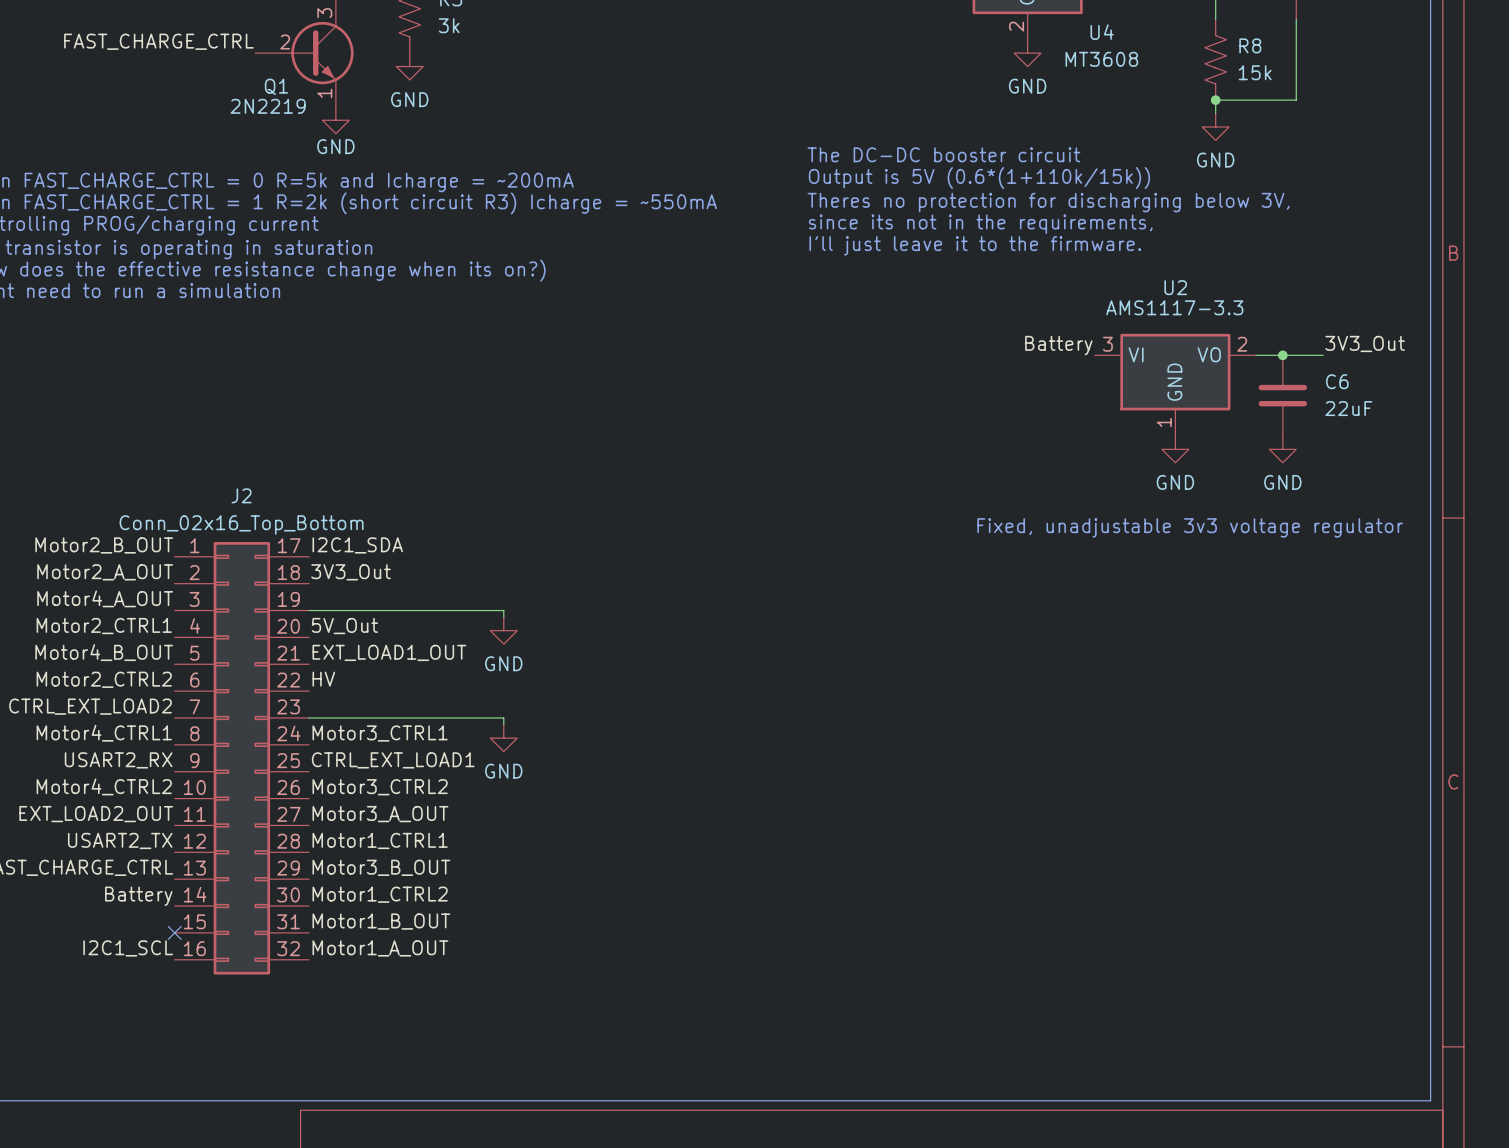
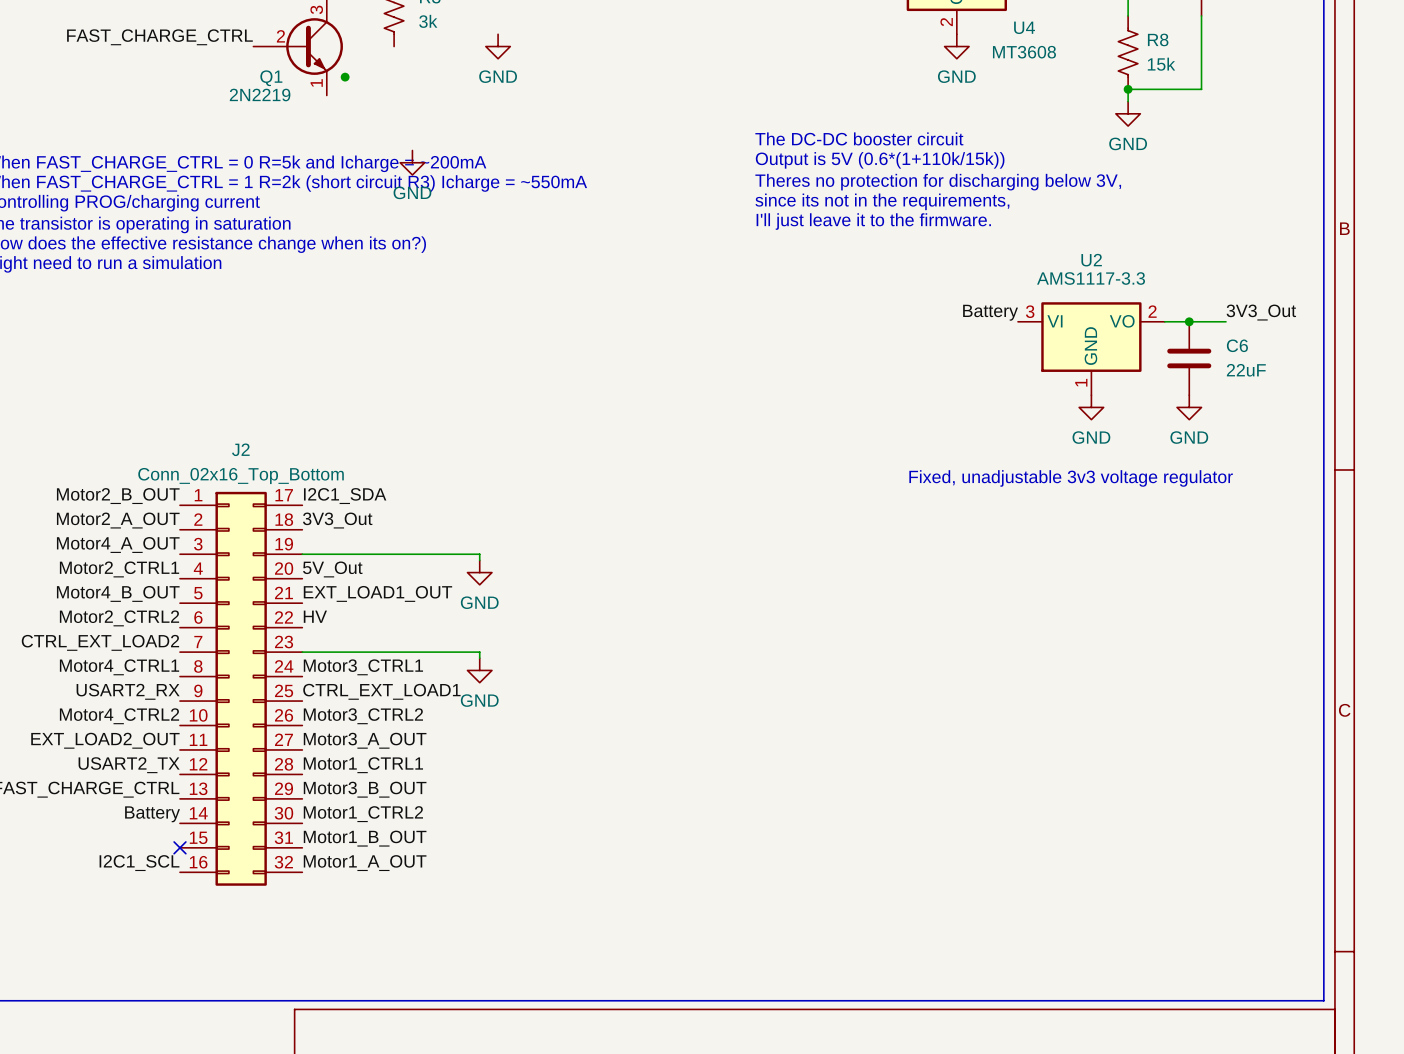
power symbol: none -> GND (498, 46)
power symbol: GND (409, 66) -> none
junction: none -> (345, 77)
power symbol: GND (335, 120) -> none
power symbol: none -> GND (412, 162)

